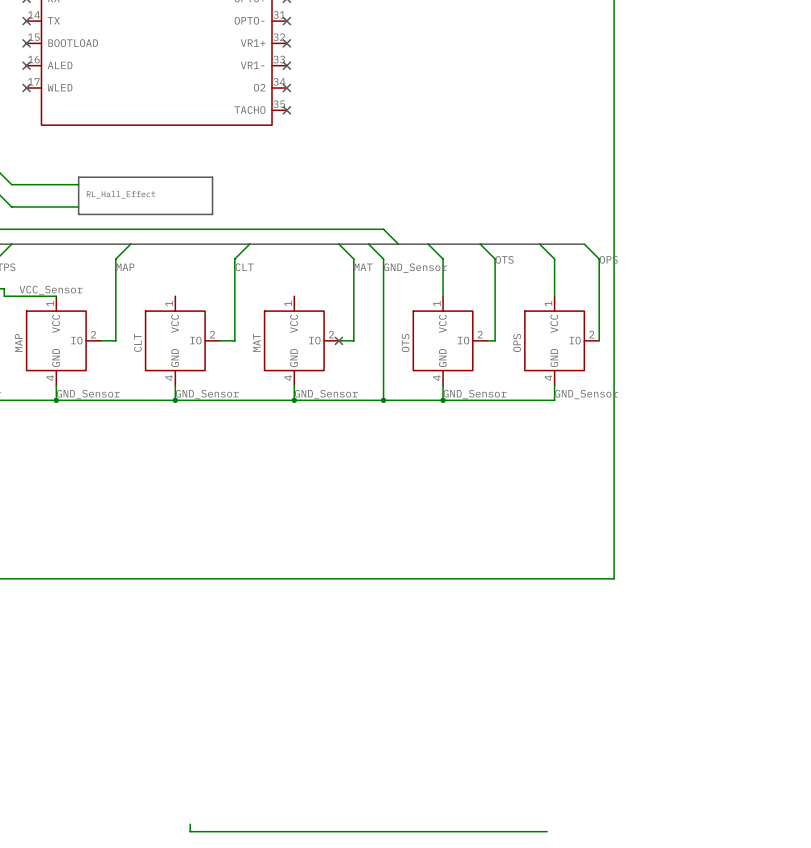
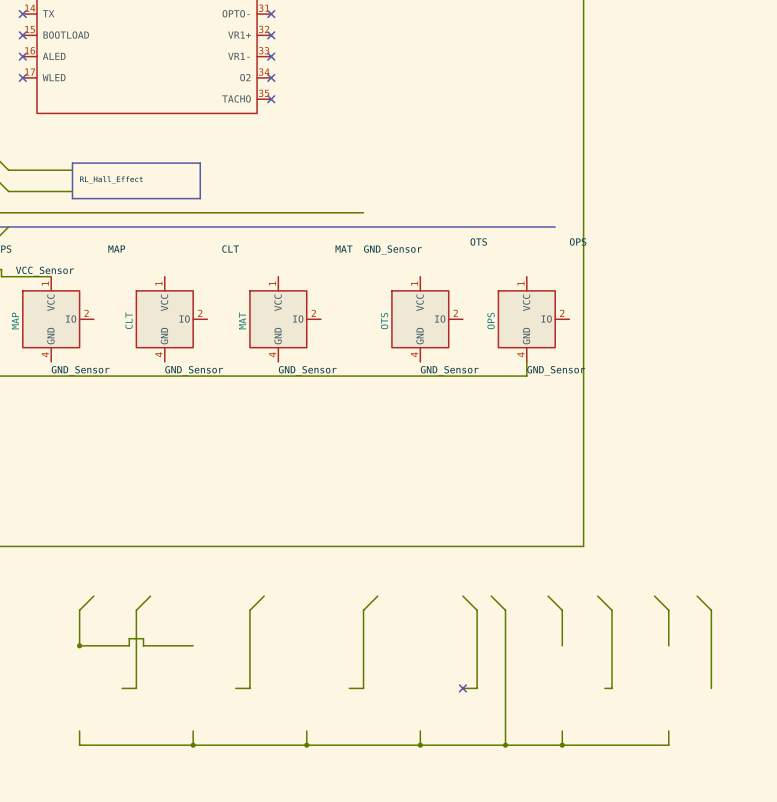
wire: (383, 229) (398, 244) -> none
wire: (130, 244) (115, 259) (115, 340) (100, 340) -> none
wire: (249, 244) (234, 259) (234, 340) (219, 340) -> none
wire: (338, 244) (353, 259) (353, 340) (338, 340) -> none
wire: (368, 244) (383, 259) (383, 400) -> none
wire: (428, 244) (443, 259) (443, 296) -> none
wire: (480, 244) (495, 259) (495, 340) (487, 340) -> none
wire: (539, 244) (554, 259) (554, 296) -> none
wire: (584, 244) (599, 259) (599, 340) -> none
no-connect mark: (338, 340) -> none
wire: (56, 385) (56, 400) -> none
wire: (175, 385) (175, 400) -> none
wire: (294, 385) (294, 400) -> none
wire: (443, 385) (443, 400) -> none
junction: (56, 400) -> none
junction: (175, 400) -> none
junction: (294, 400) -> none
junction: (383, 400) -> none
junction: (443, 400) -> none
wire: none -> (93, 596) (79, 610) (79, 645) (129, 645) (129, 638) (143, 638) (143, 645) (193, 645)
wire: none -> (150, 596) (136, 610) (136, 688) (122, 688)
wire: none -> (264, 596) (249, 610) (249, 688) (235, 688)
wire: none -> (377, 596) (363, 610) (363, 688) (349, 688)
wire: none -> (462, 596) (477, 610) (477, 688) (462, 688)
wire: none -> (491, 596) (505, 610) (505, 745)
wire: none -> (548, 596) (562, 610) (562, 645)
wire: none -> (597, 596) (611, 610) (611, 688) (604, 688)
wire: none -> (654, 596) (668, 610) (668, 645)
wire: none -> (697, 596) (711, 610) (711, 688)
junction: none -> (79, 645)
no-connect mark: none -> (462, 688)
wire: none -> (79, 730) (79, 745) (668, 745) (668, 730)
wire: none -> (193, 730) (193, 745)
wire: none -> (306, 730) (306, 745)
wire: none -> (420, 730) (420, 745)
wire: none -> (562, 730) (562, 745)
junction: none -> (193, 745)
junction: none -> (306, 745)
junction: none -> (420, 745)
junction: none -> (505, 745)
junction: none -> (562, 745)
wire: (190, 824) (190, 831) (547, 831) -> none

